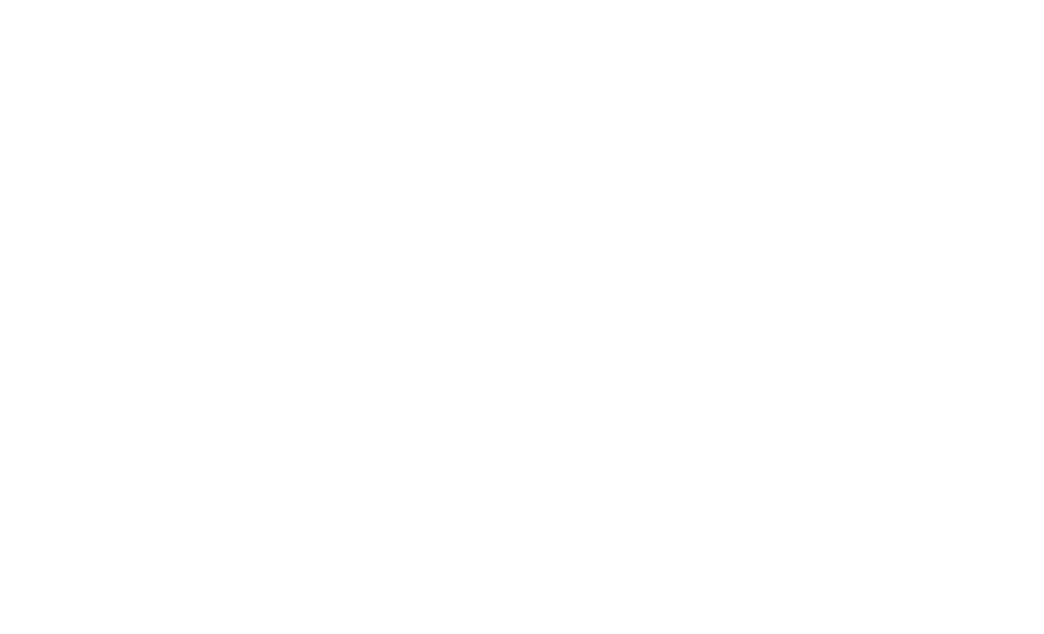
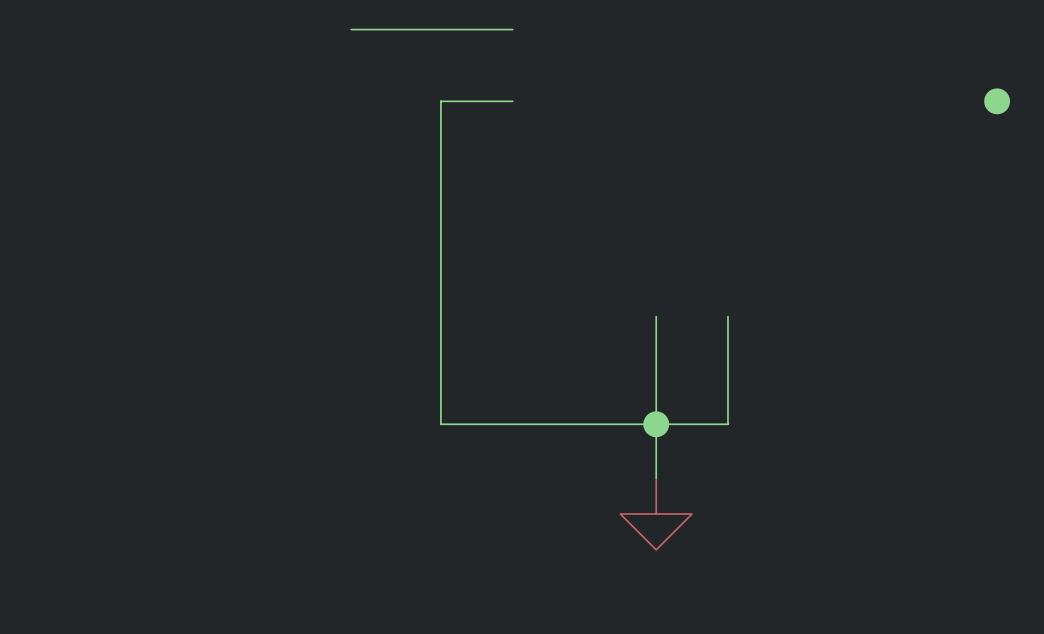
wire: none -> (351, 29) (512, 29)
wire: none -> (512, 101) (440, 101) (440, 424) (727, 424) (727, 316)
junction: none -> (997, 101)
wire: none -> (656, 316) (656, 478)
junction: none -> (656, 424)
power symbol: none -> (656, 513)

